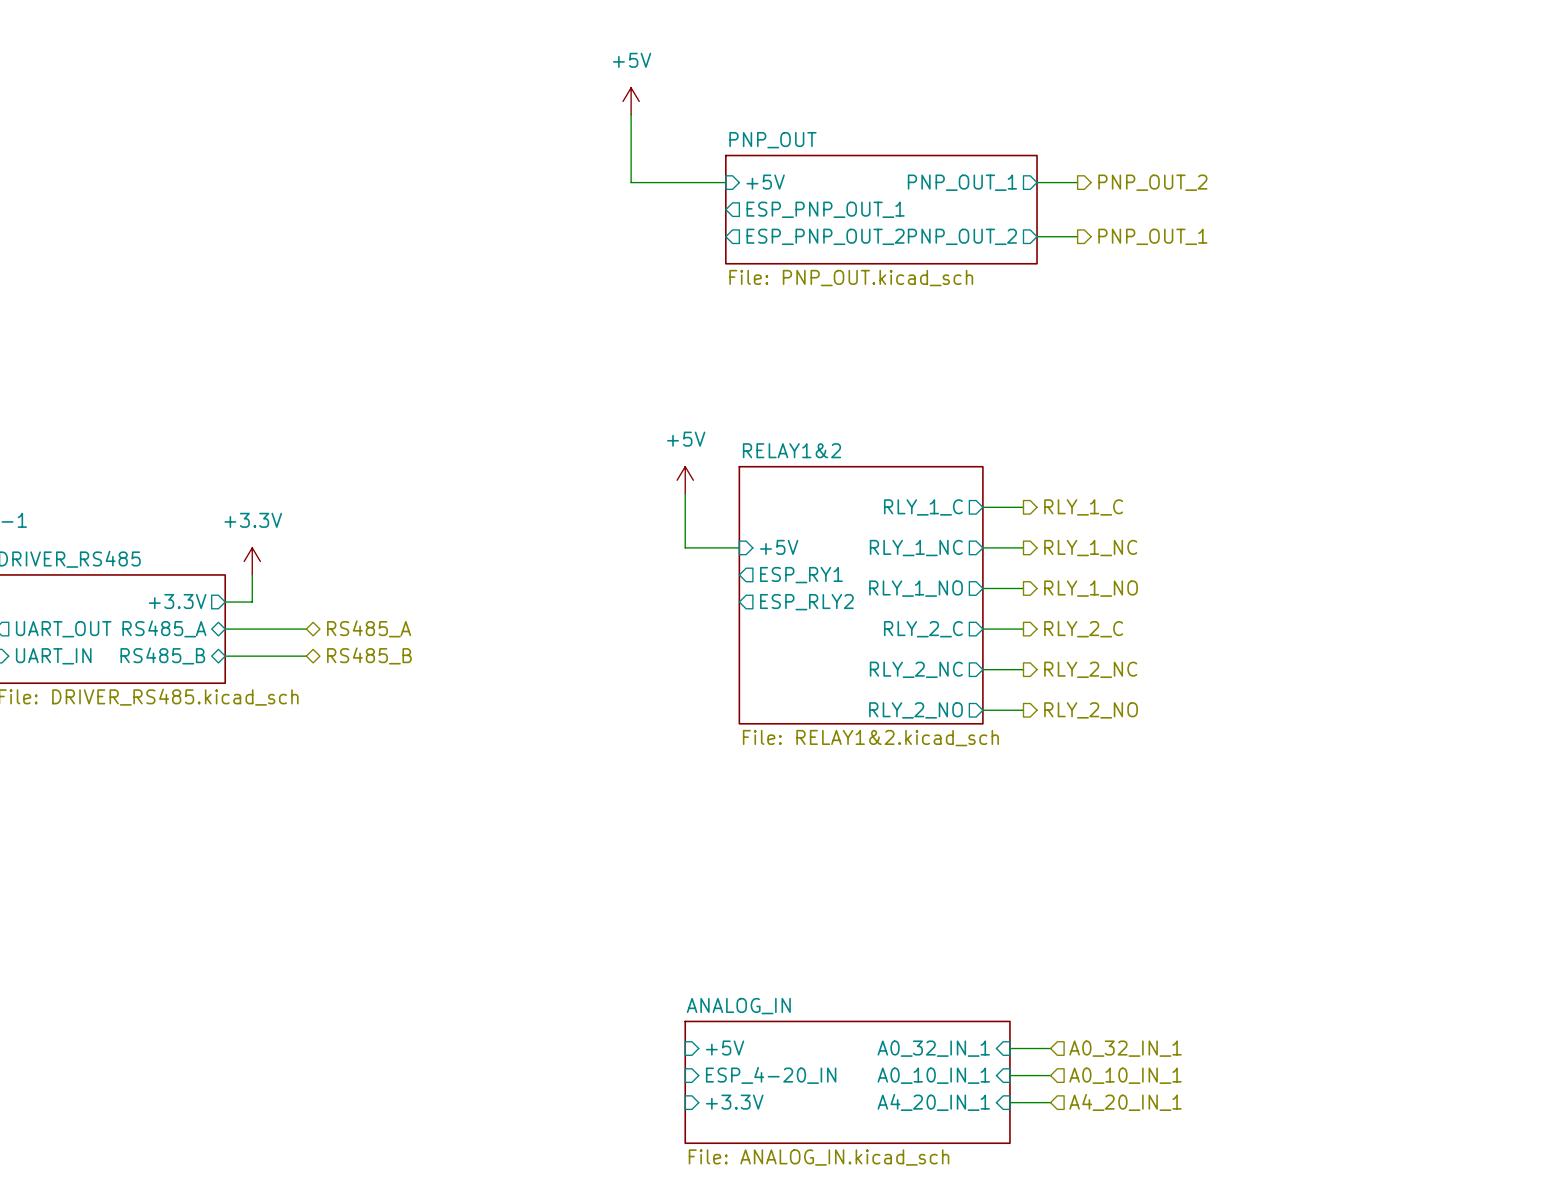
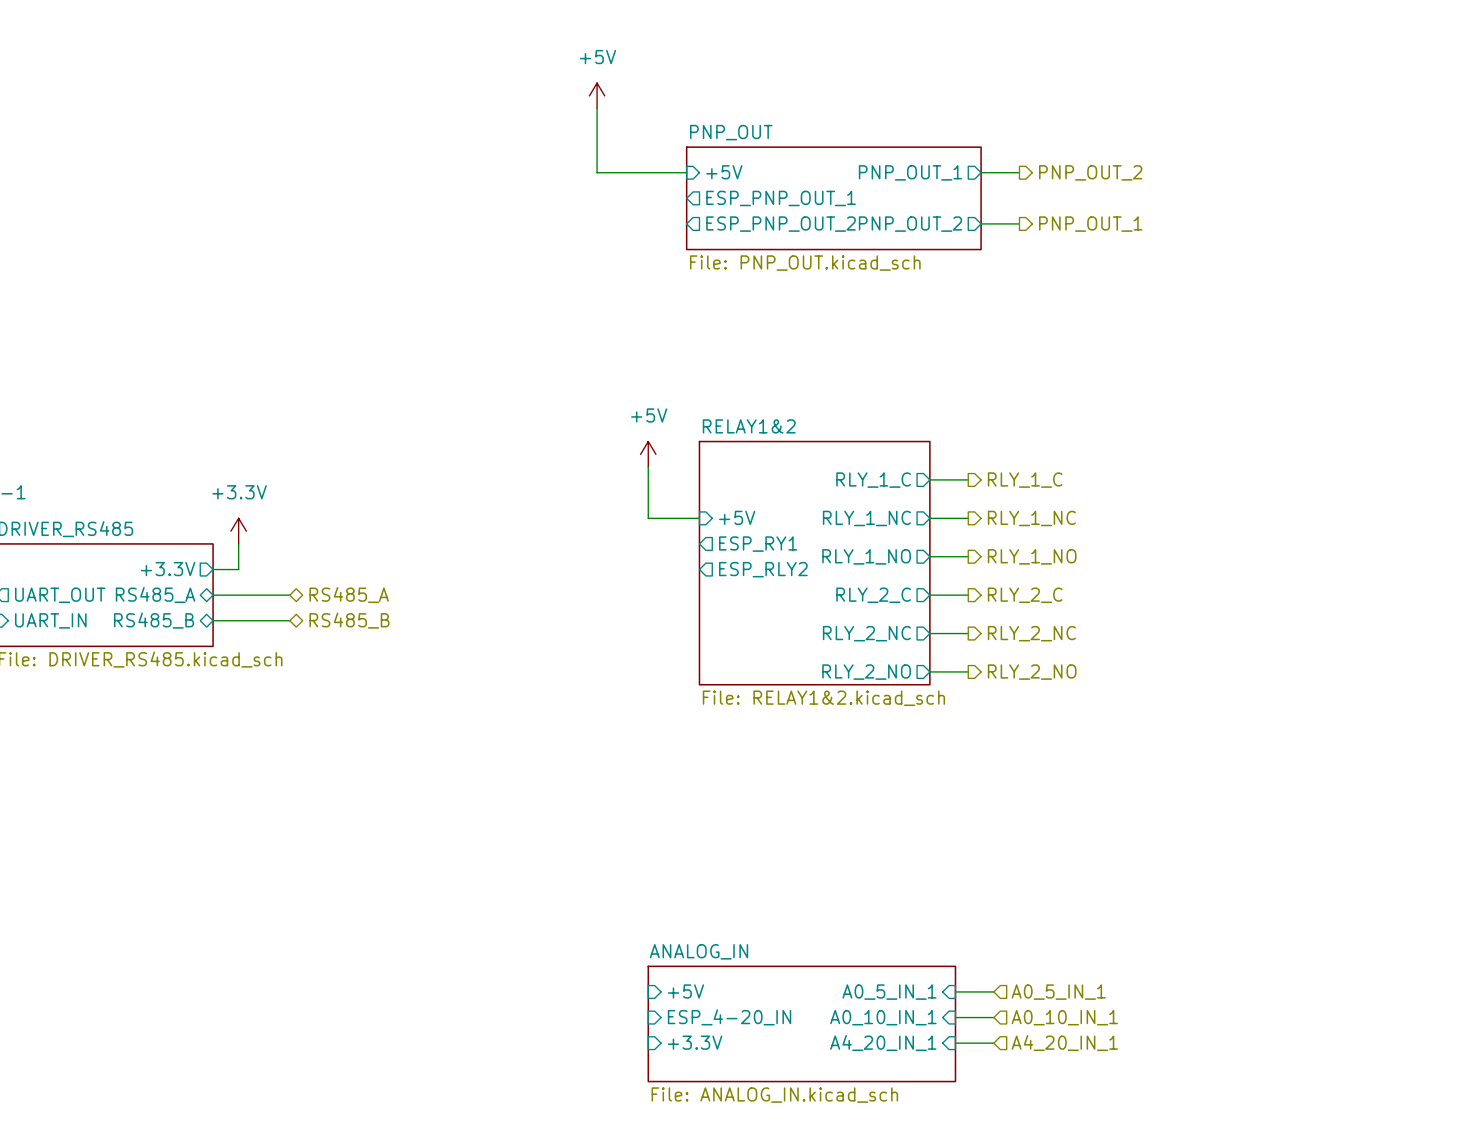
sheet pin: A0_32_IN_1 (933, 1048) -> A0_5_IN_1 (889, 992)
hierarchical label: A0_32_IN_1 (1125, 1048) -> A0_5_IN_1 (1058, 992)

